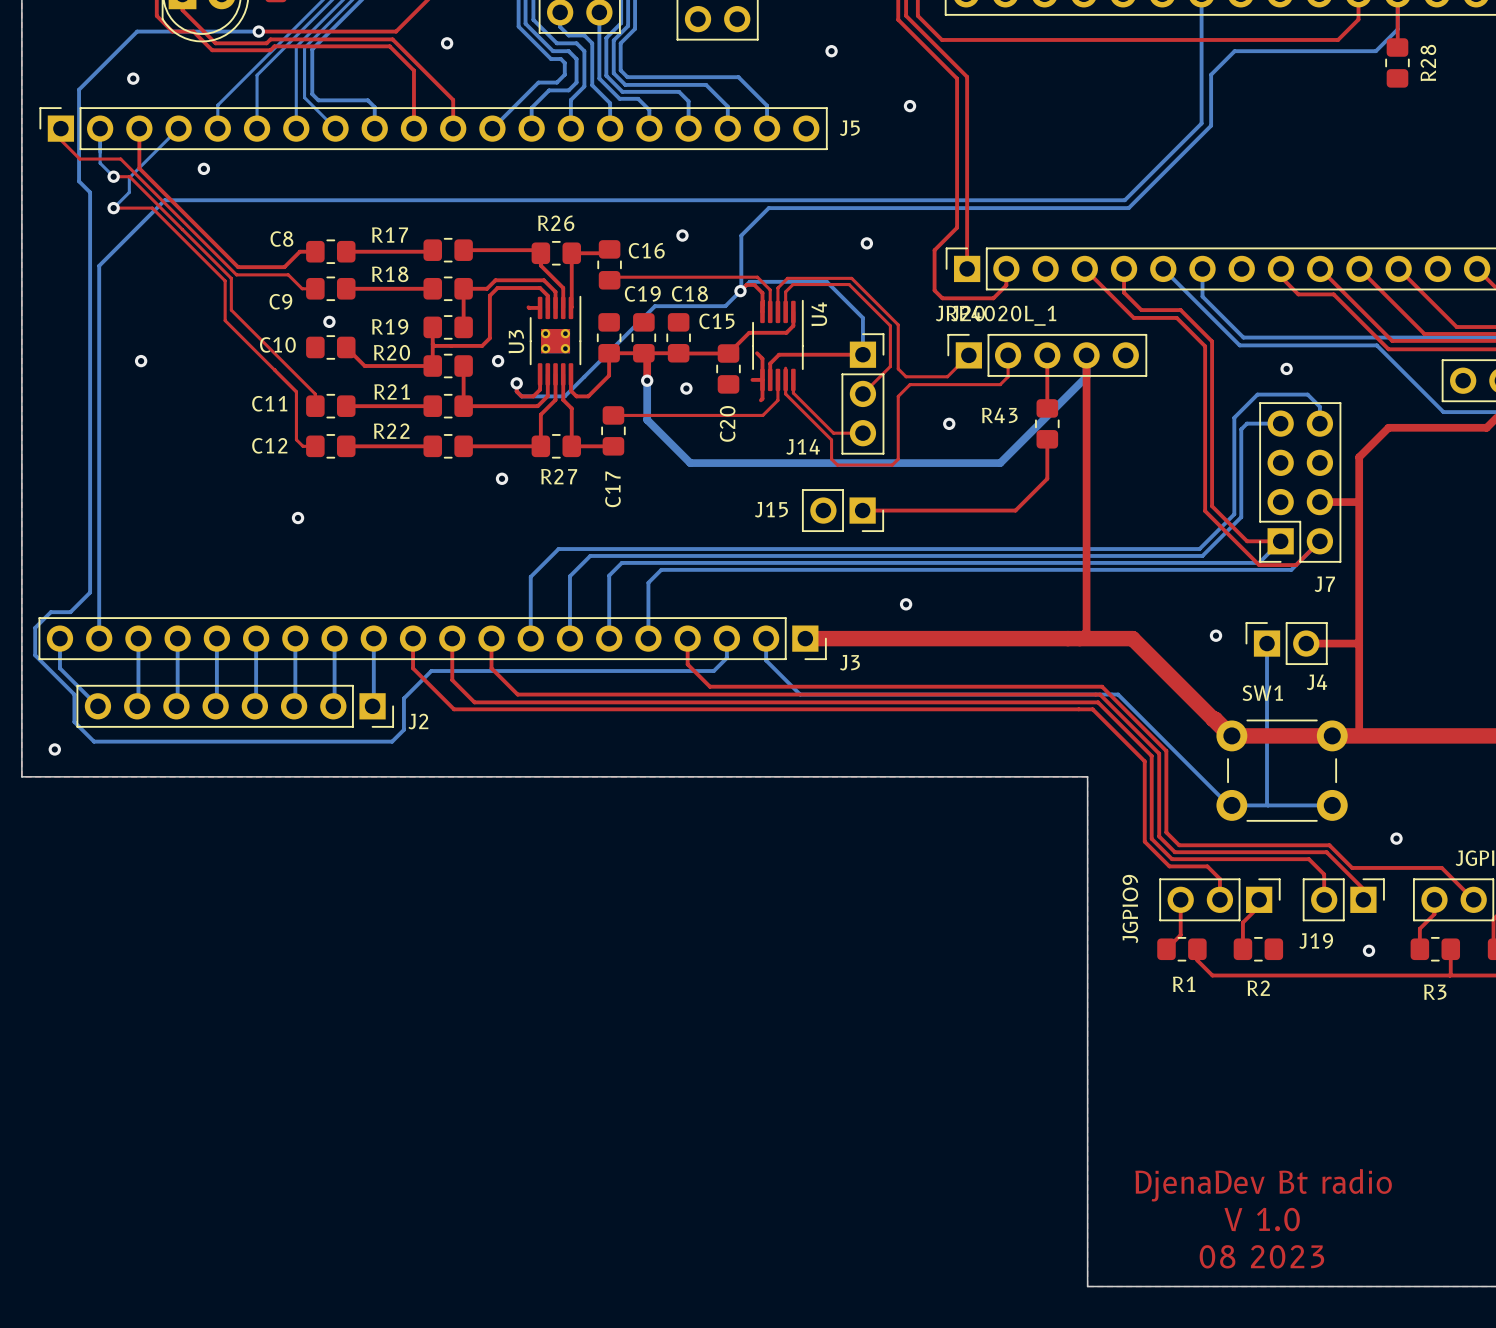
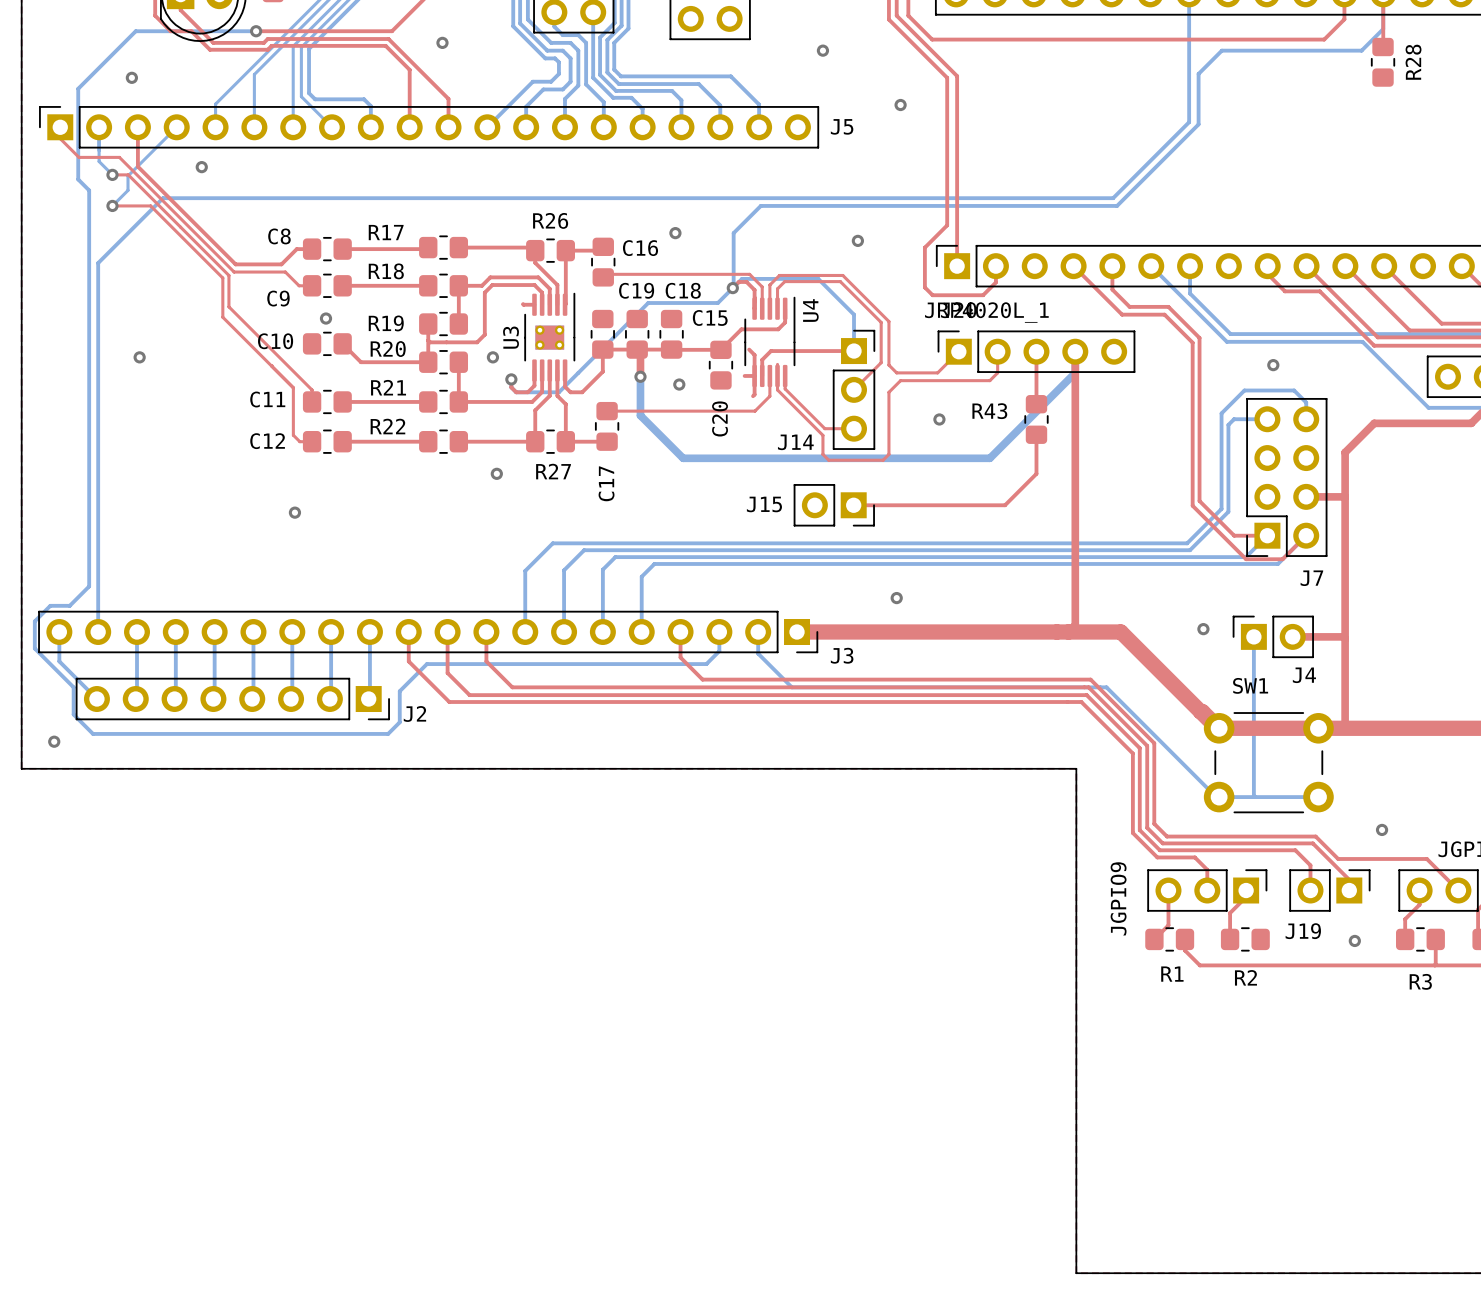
text: DjenaDev Bt radio (1263, 1185) -> none
text: V 1.0 (1262, 1219) -> none
text: 08 2023 (1261, 1256) -> none

